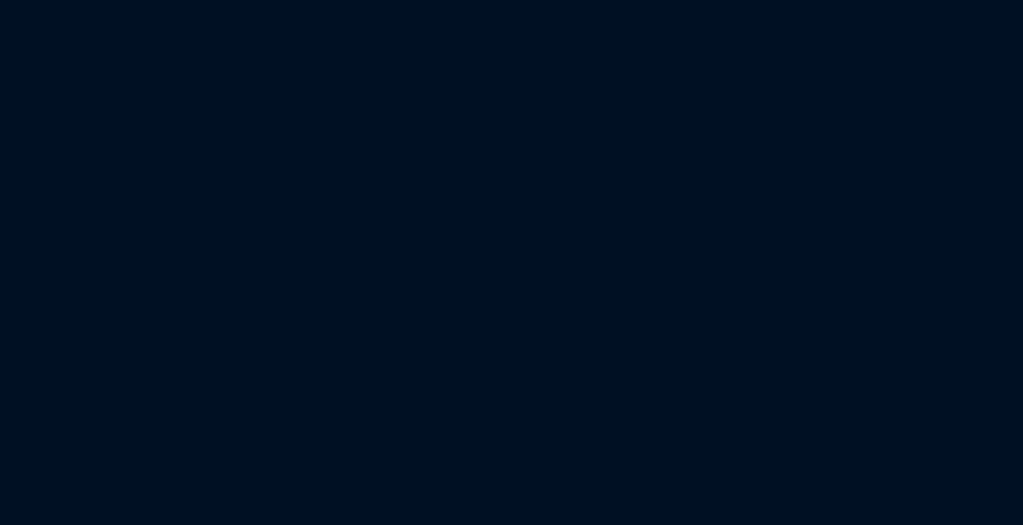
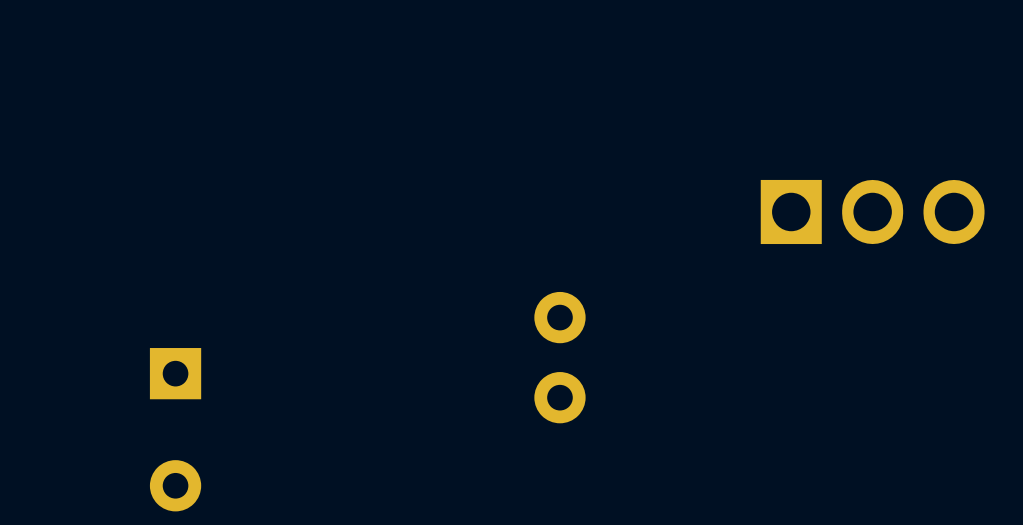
part: none -> (872, 211)
part: none -> (559, 357)
part: none -> (175, 429)

